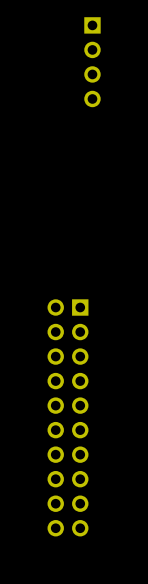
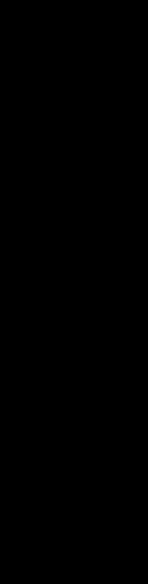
part: (92, 62) -> none
part: (67, 417) -> none

